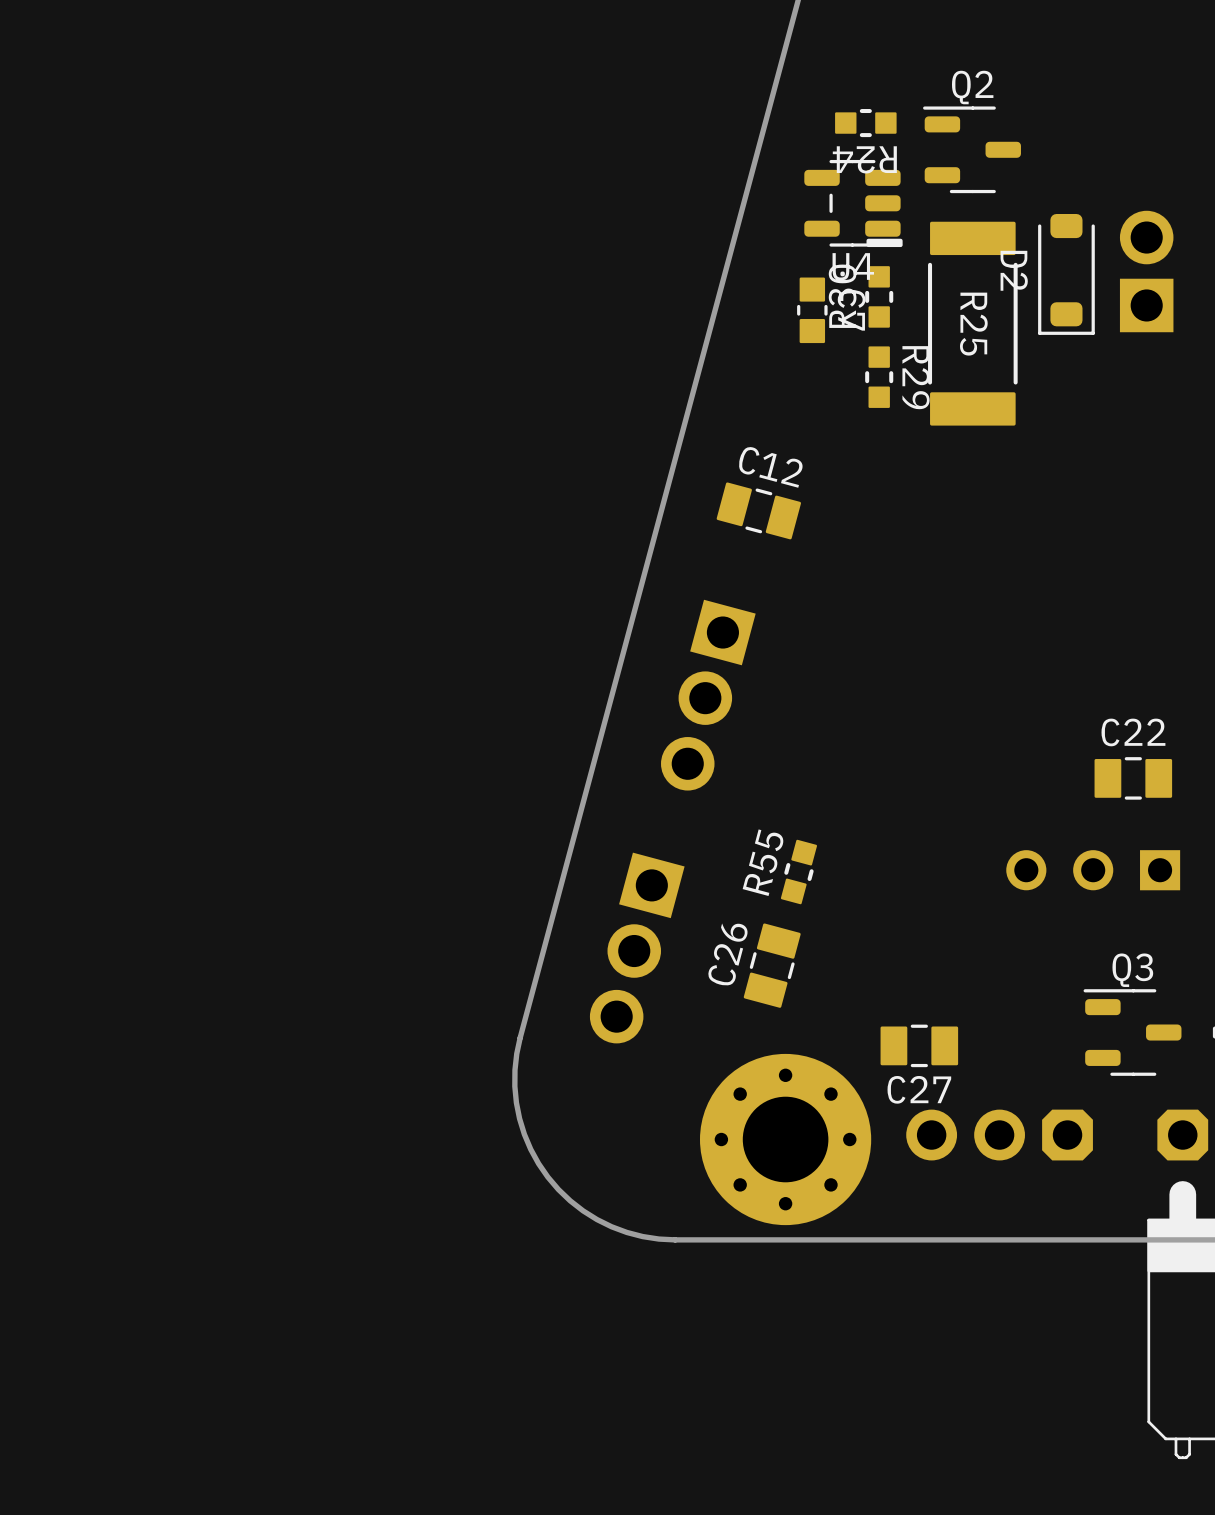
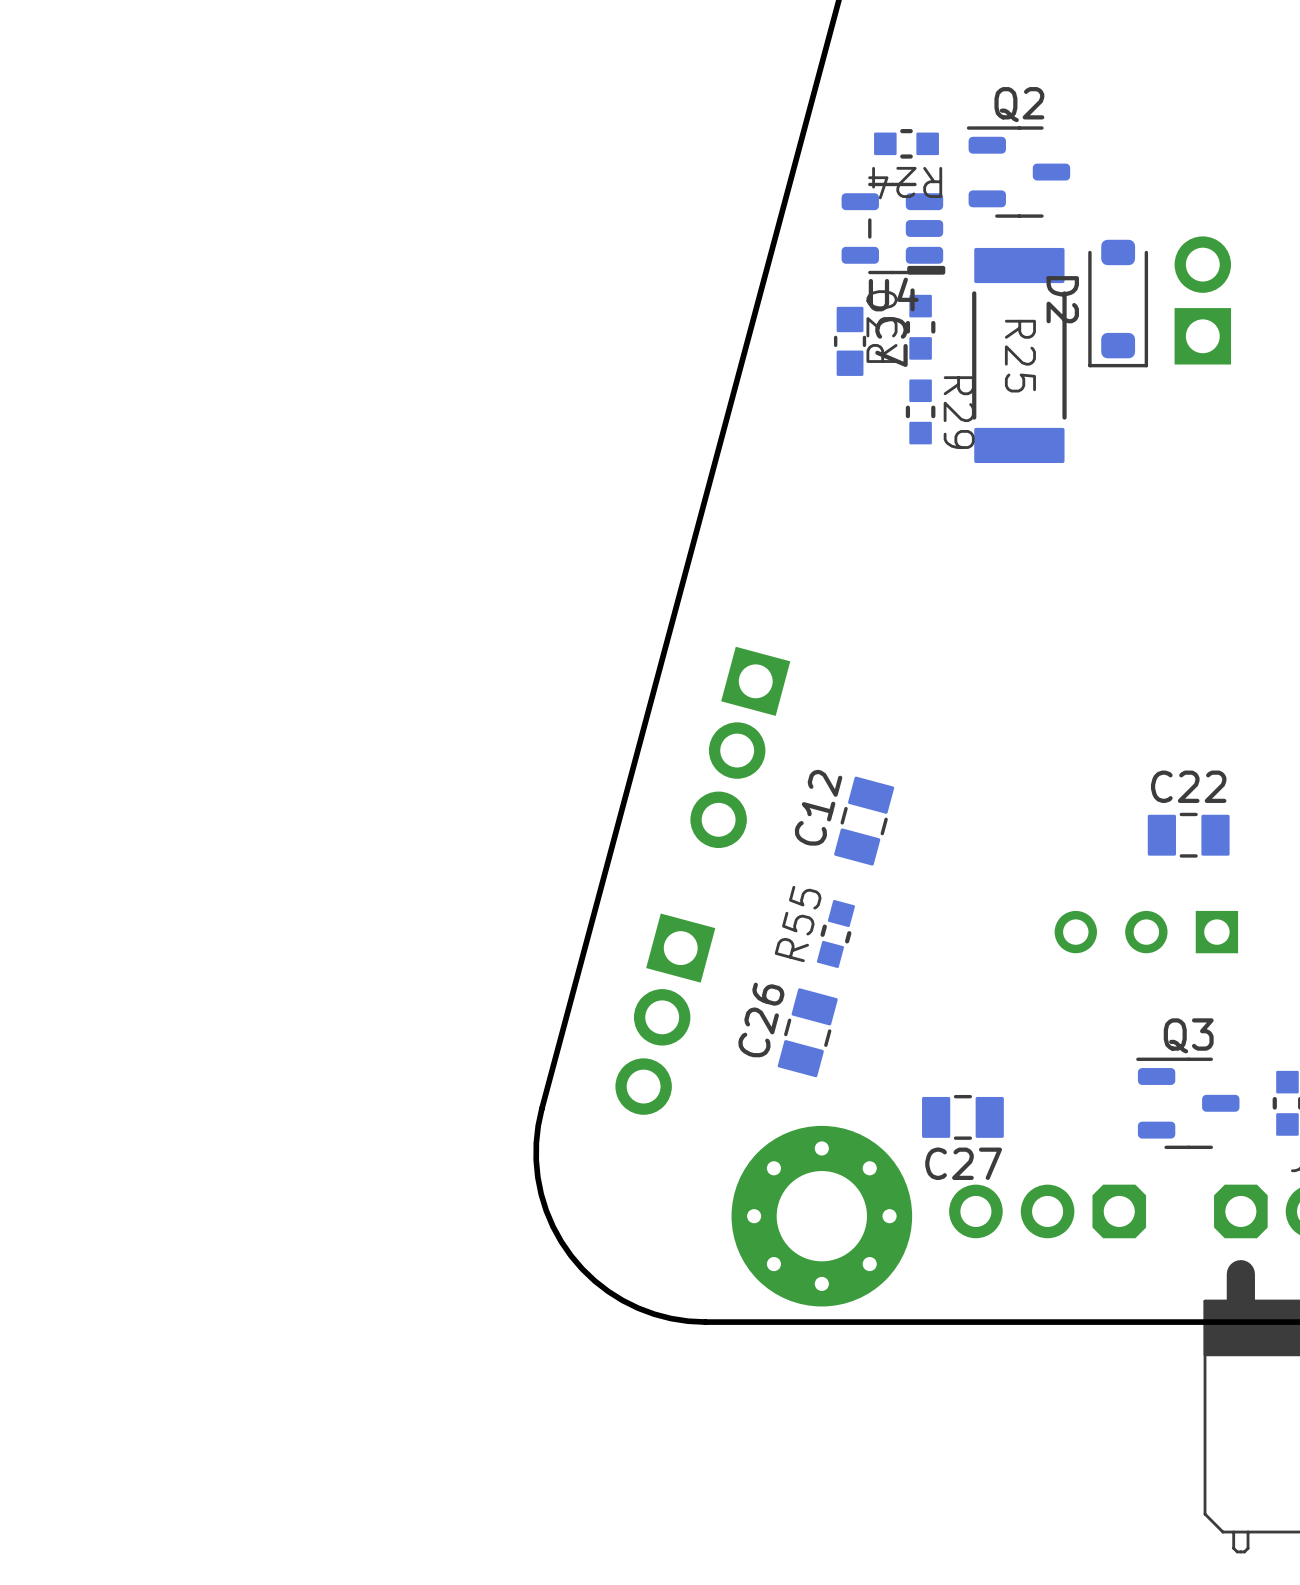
C12 name position: C12 (770, 466) -> C12 (818, 807)
C12 rotation: 0° (758, 510) -> 90° clockwise (864, 821)
C12 position: (758, 510) -> (864, 821)

